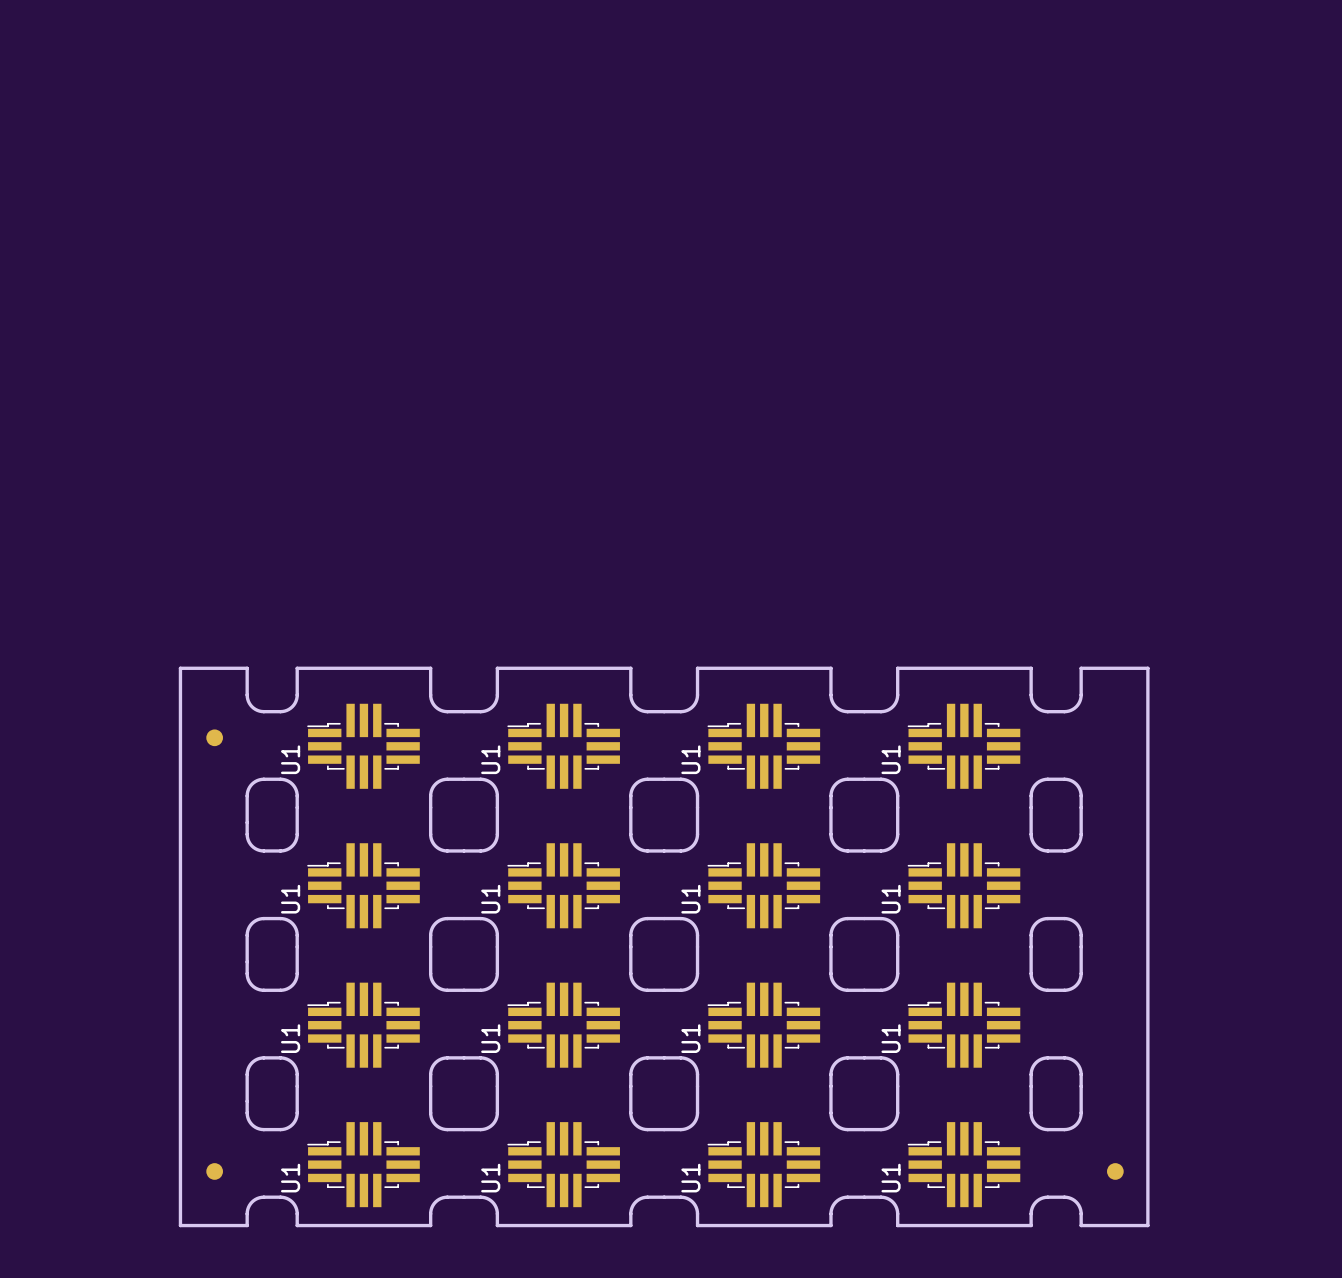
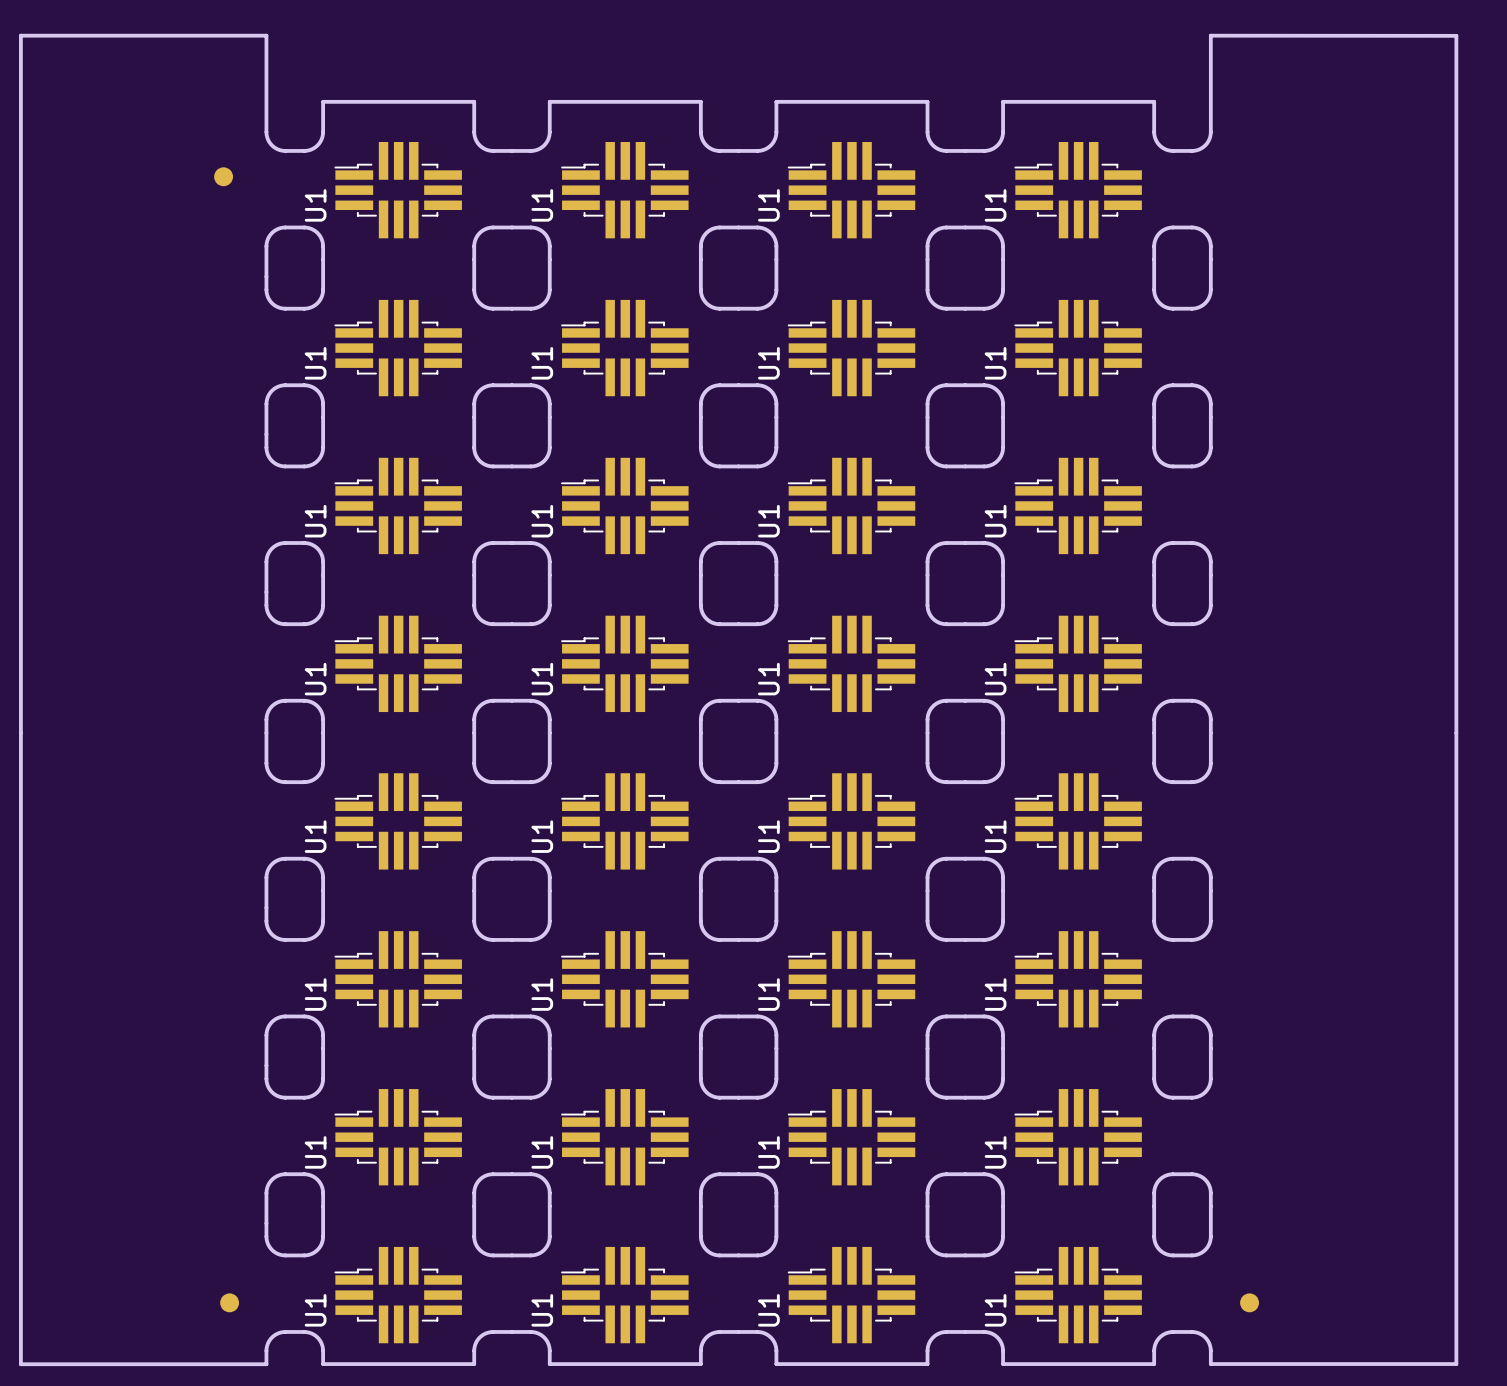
part: none -> (223, 176)
U1: none -> (398, 190)
U1: none -> (624, 190)
U1: none -> (851, 190)
U1: none -> (1078, 190)
board edge: none -> (285, 227) (311, 228) (317, 233) (322, 241) (322, 294) (317, 303) (309, 308) (280, 308) (271, 303) (267, 294) (267, 241) (273, 231) (285, 227)
board edge: none -> (493, 227) (533, 227) (540, 230) (547, 236) (549, 246) (549, 292) (545, 301) (540, 306) (530, 308) (490, 308) (483, 306) (476, 299) (474, 289) (474, 241) (481, 231) (493, 227)
board edge: none -> (719, 227) (759, 227) (766, 230) (773, 236) (776, 246) (776, 292) (772, 301) (766, 306) (757, 308) (717, 308) (708, 304) (703, 299) (700, 289) (701, 241) (708, 231) (719, 227)
board edge: none -> (946, 227) (986, 227) (993, 230) (1000, 236) (1003, 246) (1002, 292) (999, 301) (993, 306) (984, 308) (943, 308) (936, 306) (930, 299) (927, 289) (928, 241) (934, 231) (946, 227)
board edge: none -> (1173, 227) (1199, 228) (1206, 234) (1210, 241) (1210, 294) (1205, 303) (1196, 308) (1168, 308) (1159, 303) (1154, 294) (1154, 241) (1161, 231) (1173, 227)
U1: none -> (398, 348)
U1: none -> (624, 348)
U1: none -> (851, 348)
U1: none -> (1078, 348)
board edge: none -> (285, 385) (311, 386) (317, 390) (322, 399) (322, 452) (317, 460) (309, 465) (280, 465) (271, 460) (267, 452) (267, 399) (273, 389) (285, 385)
board edge: none -> (493, 385) (533, 385) (540, 387) (547, 394) (549, 404) (549, 450) (545, 459) (540, 463) (530, 466) (490, 466) (483, 463) (476, 457) (474, 447) (474, 399) (481, 389) (493, 385)
board edge: none -> (719, 385) (759, 385) (766, 387) (773, 394) (776, 404) (776, 450) (772, 459) (766, 463) (757, 466) (717, 466) (708, 462) (703, 457) (700, 447) (701, 399) (708, 389) (719, 385)
board edge: none -> (946, 385) (986, 385) (993, 387) (1000, 394) (1003, 404) (1002, 450) (999, 459) (993, 463) (984, 466) (943, 466) (936, 463) (930, 457) (927, 447) (928, 399) (934, 389) (946, 385)
board edge: none -> (1173, 385) (1199, 386) (1206, 392) (1210, 399) (1210, 452) (1205, 460) (1196, 465) (1168, 465) (1159, 460) (1154, 452) (1154, 399) (1161, 389) (1173, 385)
U1: none -> (398, 505)
U1: none -> (624, 505)
U1: none -> (851, 505)
U1: none -> (1078, 505)
board edge: none -> (285, 542) (311, 544) (317, 548) (322, 556) (322, 610) (317, 618) (309, 623) (280, 623) (271, 618) (267, 610) (267, 556) (273, 546) (285, 542)
board edge: none -> (493, 542) (533, 543) (540, 545) (547, 552) (549, 561) (549, 607) (545, 616) (540, 621) (530, 624) (490, 624) (481, 620) (476, 614) (474, 605) (474, 556) (481, 546) (493, 542)
board edge: none -> (719, 542) (759, 543) (766, 545) (773, 552) (776, 561) (776, 607) (772, 616) (766, 621) (757, 624) (717, 624) (708, 620) (703, 614) (700, 605) (701, 556) (708, 546) (719, 542)
board edge: none -> (946, 542) (986, 543) (993, 545) (1000, 552) (1003, 561) (1002, 607) (999, 616) (993, 621) (984, 624) (943, 624) (934, 620) (930, 614) (927, 605) (928, 556) (934, 546) (946, 542)
board edge: none -> (1173, 542) (1199, 544) (1206, 550) (1210, 556) (1210, 610) (1205, 618) (1196, 623) (1168, 623) (1159, 618) (1154, 610) (1154, 556) (1161, 546) (1173, 542)
U1: none -> (398, 663)
U1: none -> (624, 663)
U1: none -> (851, 663)
U1: none -> (1078, 663)
board edge: none -> (20, 732) (20, 35) (266, 35) (266, 134) (271, 145) (285, 150) (309, 150) (319, 143) (322, 134) (323, 101) (474, 101) (475, 139) (483, 148) (493, 150) (533, 150) (542, 147) (549, 134) (549, 101) (700, 101) (701, 134) (708, 147) (717, 150) (757, 150) (766, 148) (774, 139) (776, 101) (927, 101) (928, 139) (936, 148) (946, 150) (986, 150) (995, 147) (1002, 134) (1003, 101) (1154, 101) (1154, 134) (1158, 143) (1170, 150) (1194, 150) (1205, 145) (1210, 134) (1210, 35) (1456, 35) (1456, 732)
board edge: (247, 668) (180, 668) (180, 1225) (247, 1225) -> (20, 733) (20, 1364) (266, 1364)
board edge: (297, 668) (430, 668) -> (323, 732) (322, 717) (320, 710) (313, 703) (304, 700) (282, 700) (273, 704) (267, 714) (266, 732)
board edge: none -> (474, 732) (474, 717) (476, 710) (483, 703) (493, 700) (530, 700) (540, 703) (549, 714) (549, 732)
board edge: (497, 668) (630, 668) -> (776, 732) (776, 717) (773, 710) (766, 703) (757, 700) (719, 700) (710, 703) (701, 714) (700, 732)
board edge: (697, 668) (830, 668) -> (1003, 732) (1002, 717) (1000, 710) (993, 703) (984, 700) (946, 700) (936, 703) (928, 714) (927, 732)
board edge: (897, 668) (1031, 668) -> (1210, 732) (1210, 717) (1208, 710) (1201, 703) (1191, 700) (1170, 700) (1161, 704) (1154, 714) (1154, 732)
board edge: (1081, 668) (1147, 668) (1147, 1225) -> (1456, 733) (1456, 1364) (1286, 1364)
part: (214, 737) -> none

